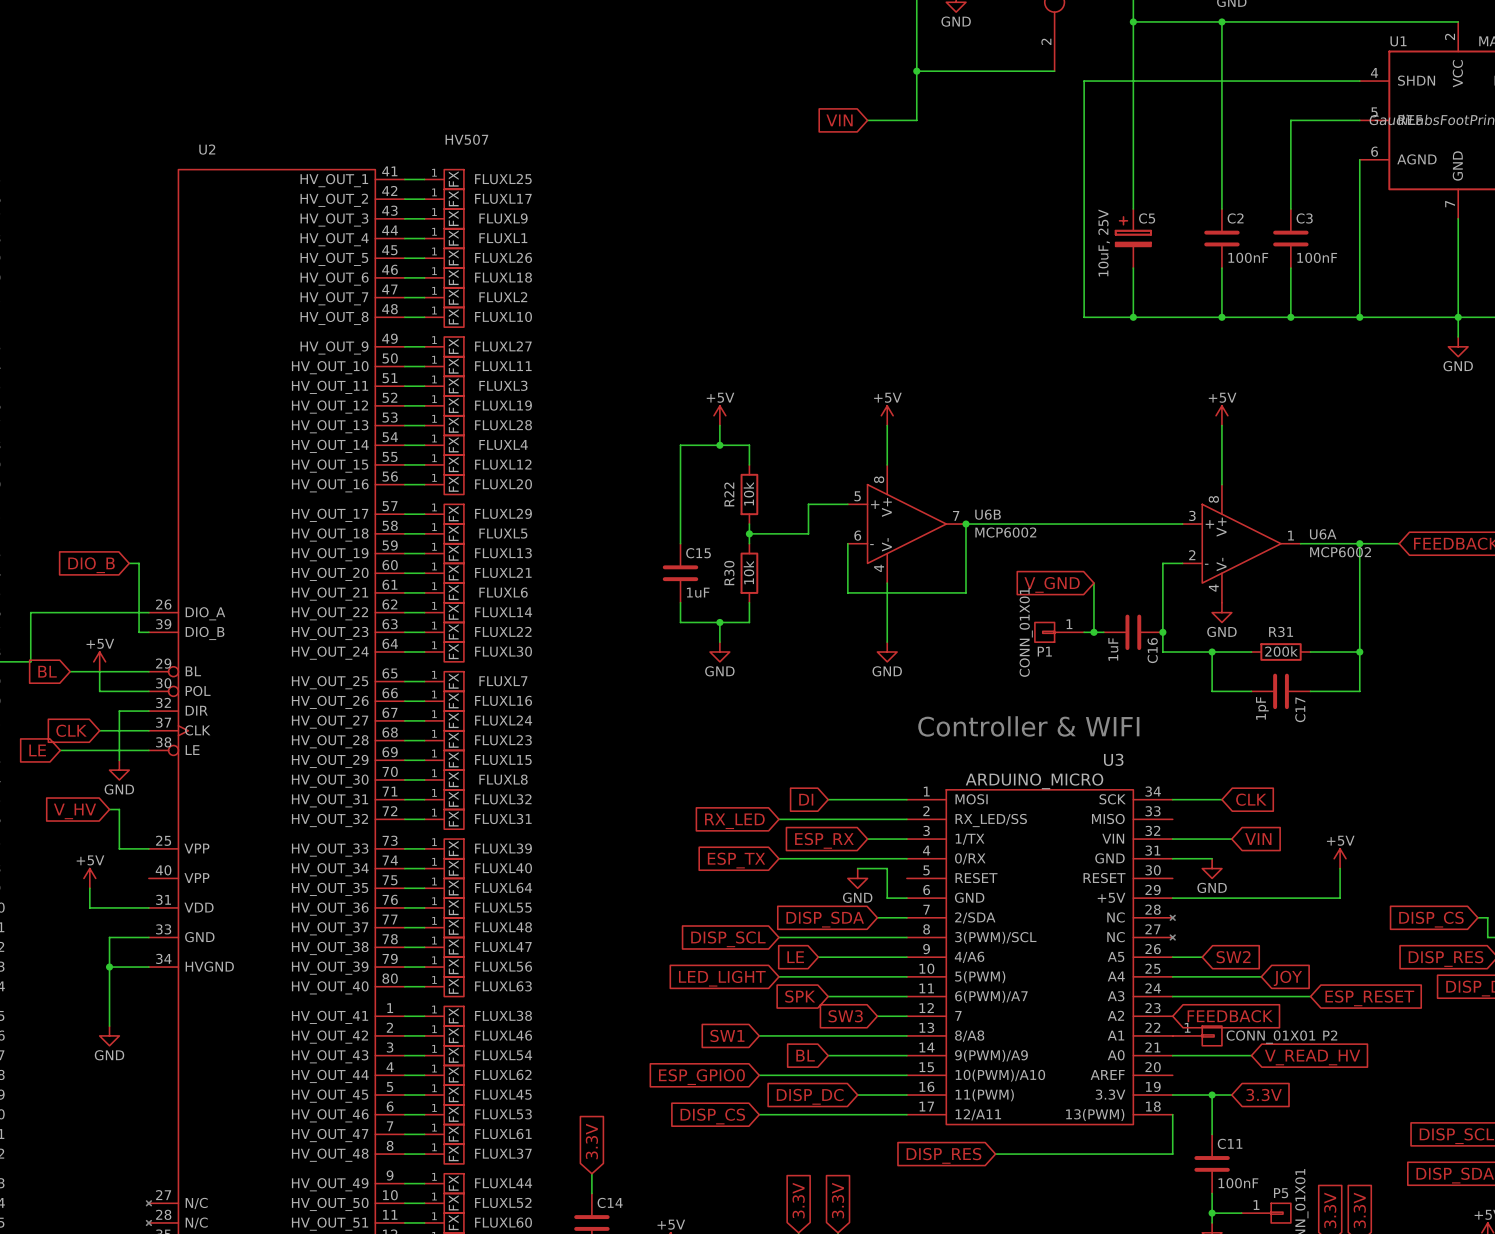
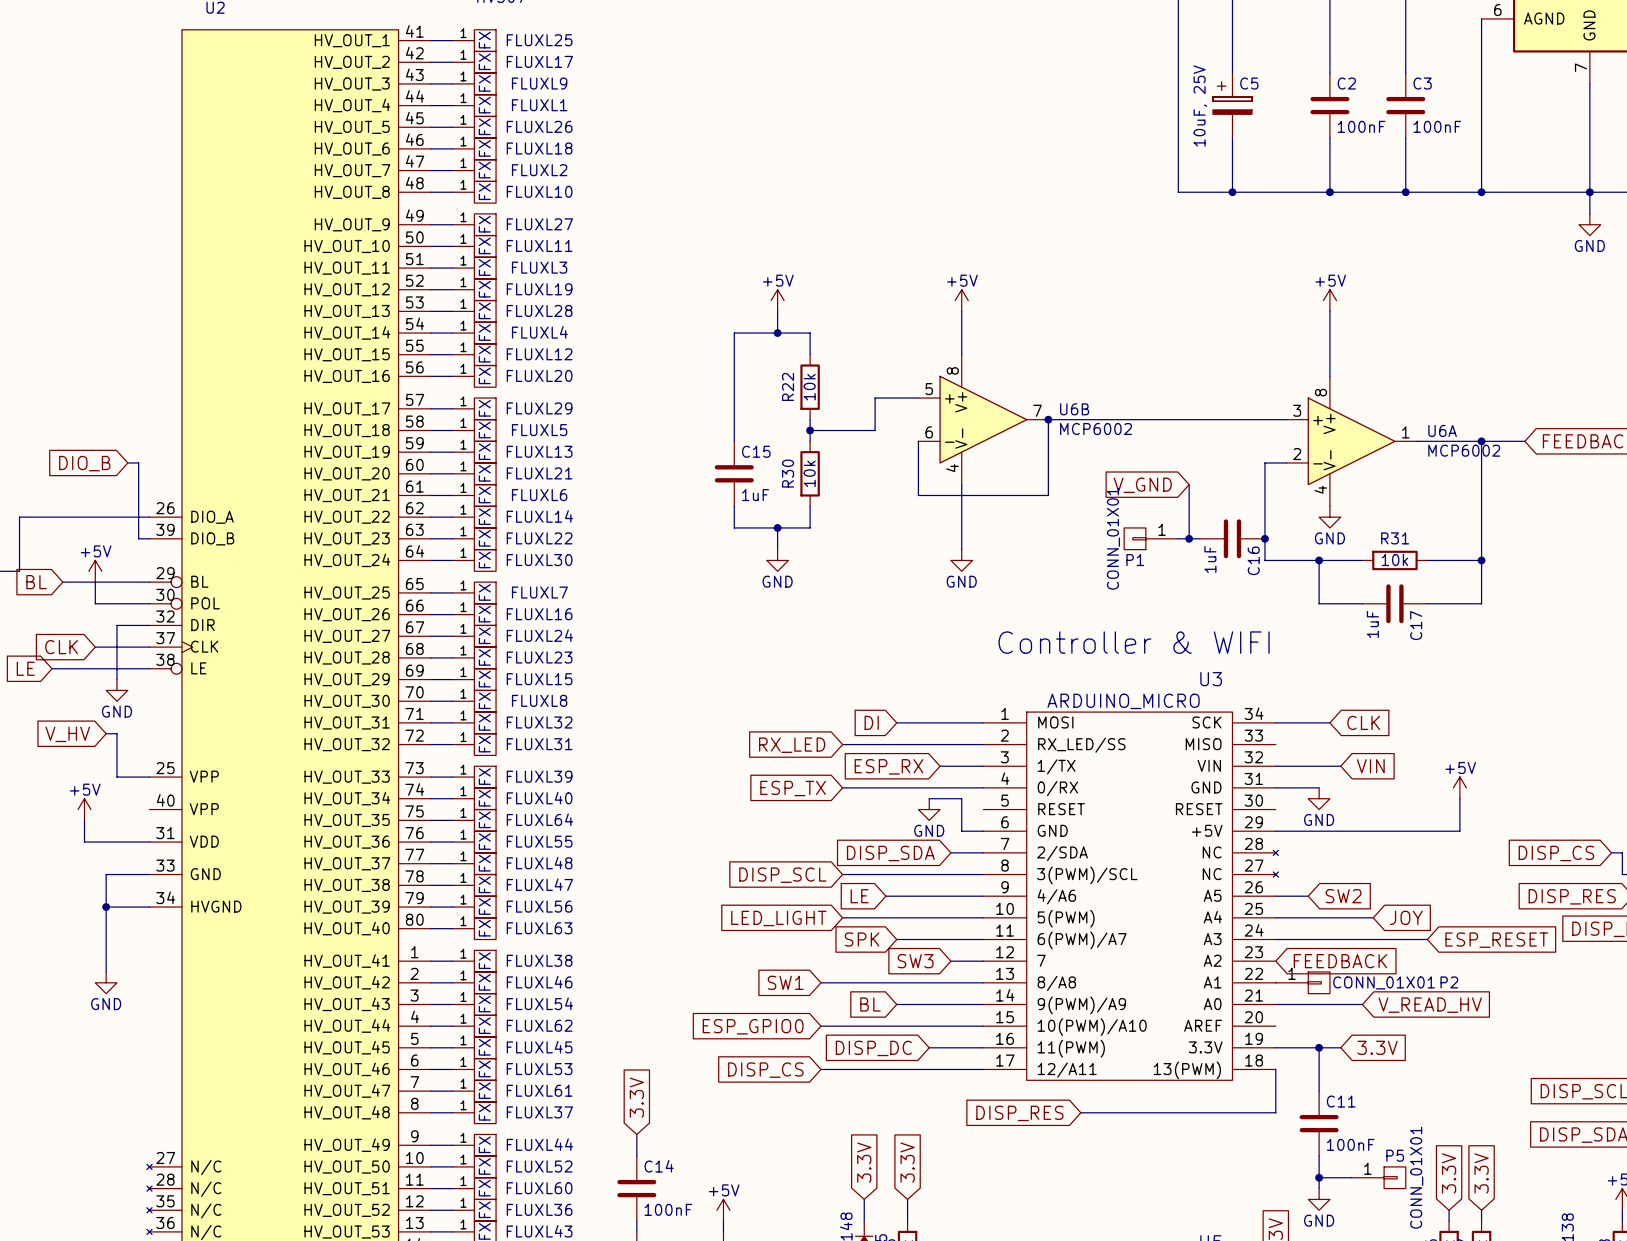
R31 value: 200k (1281, 651) -> 10k (1394, 560)
C17 value: 1pF (1262, 708) -> 1uF (1372, 624)

